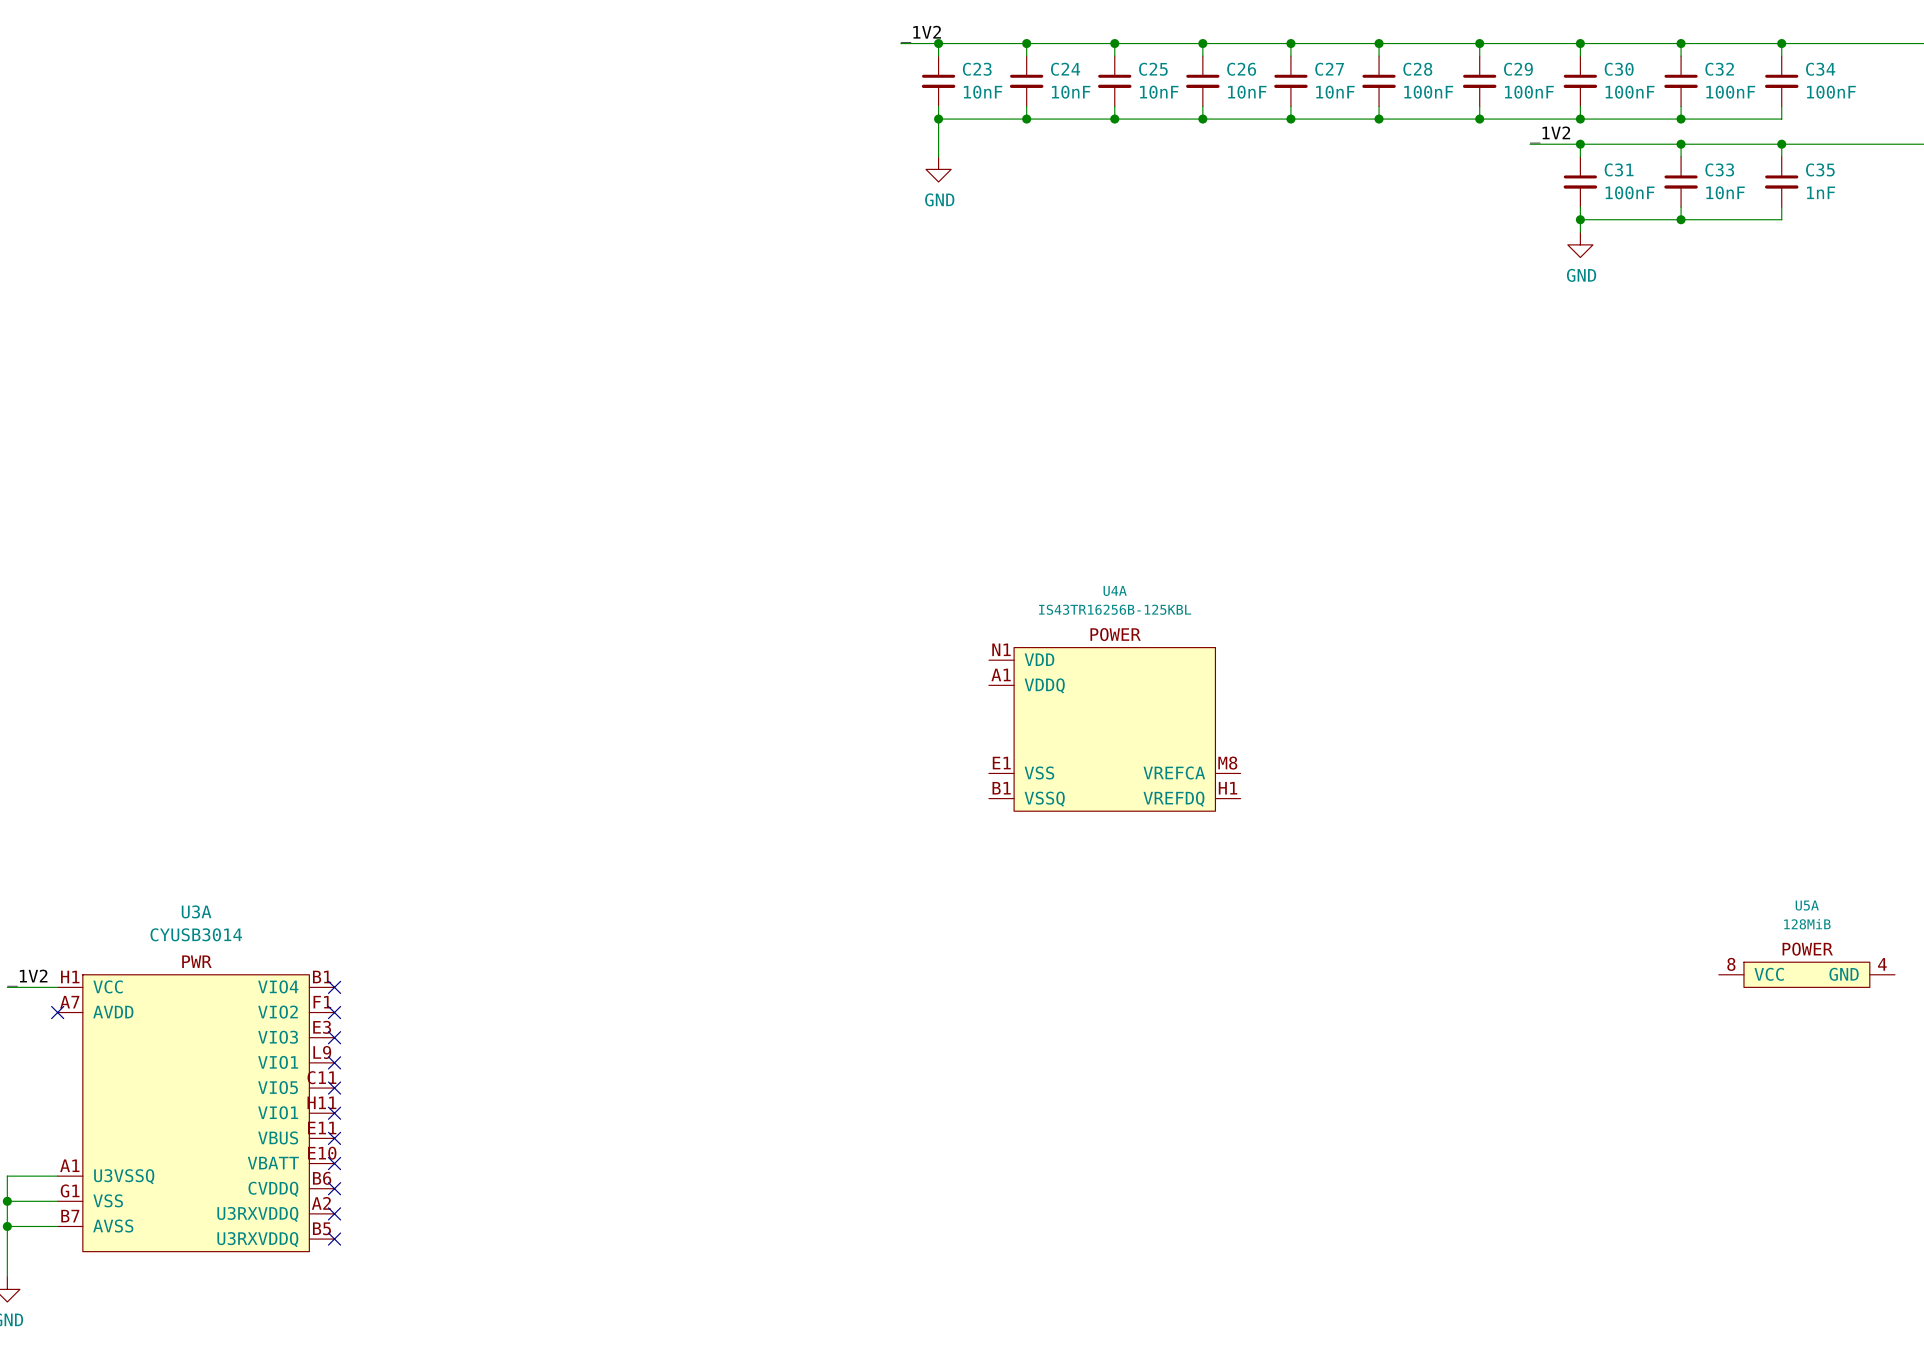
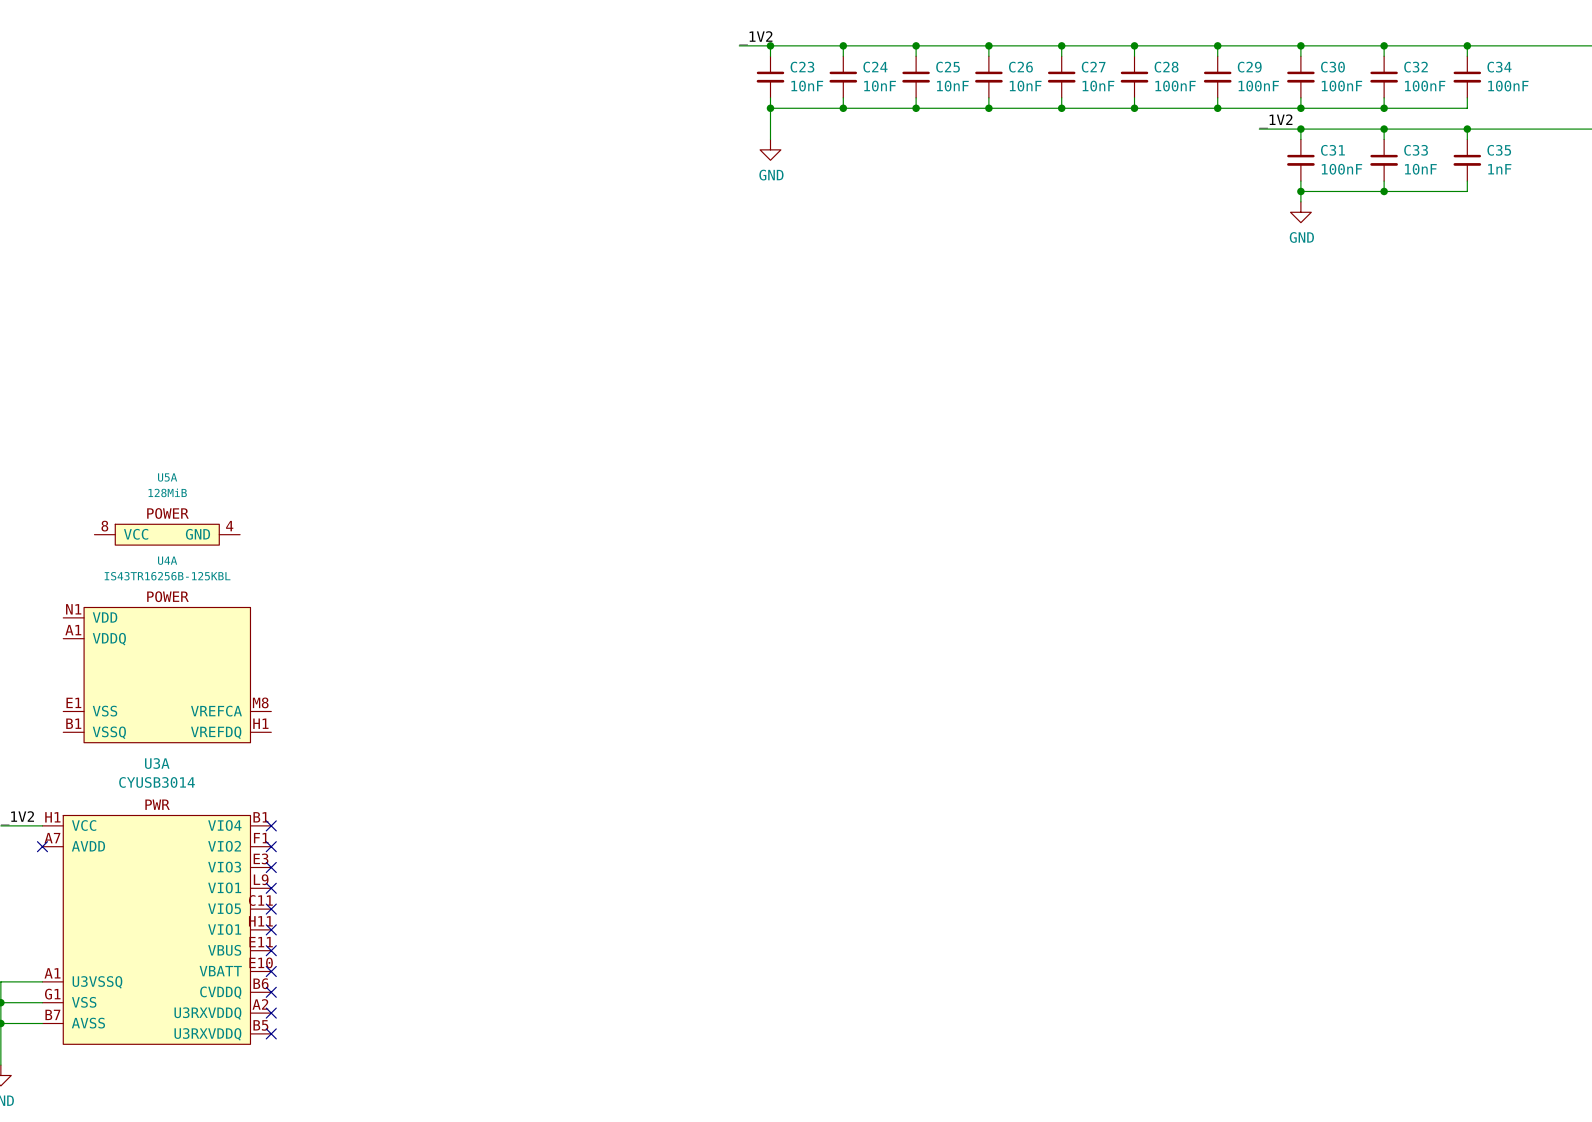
U4A position: (1114, 729) -> (167, 675)
U5A position: (1806, 974) -> (167, 534)

